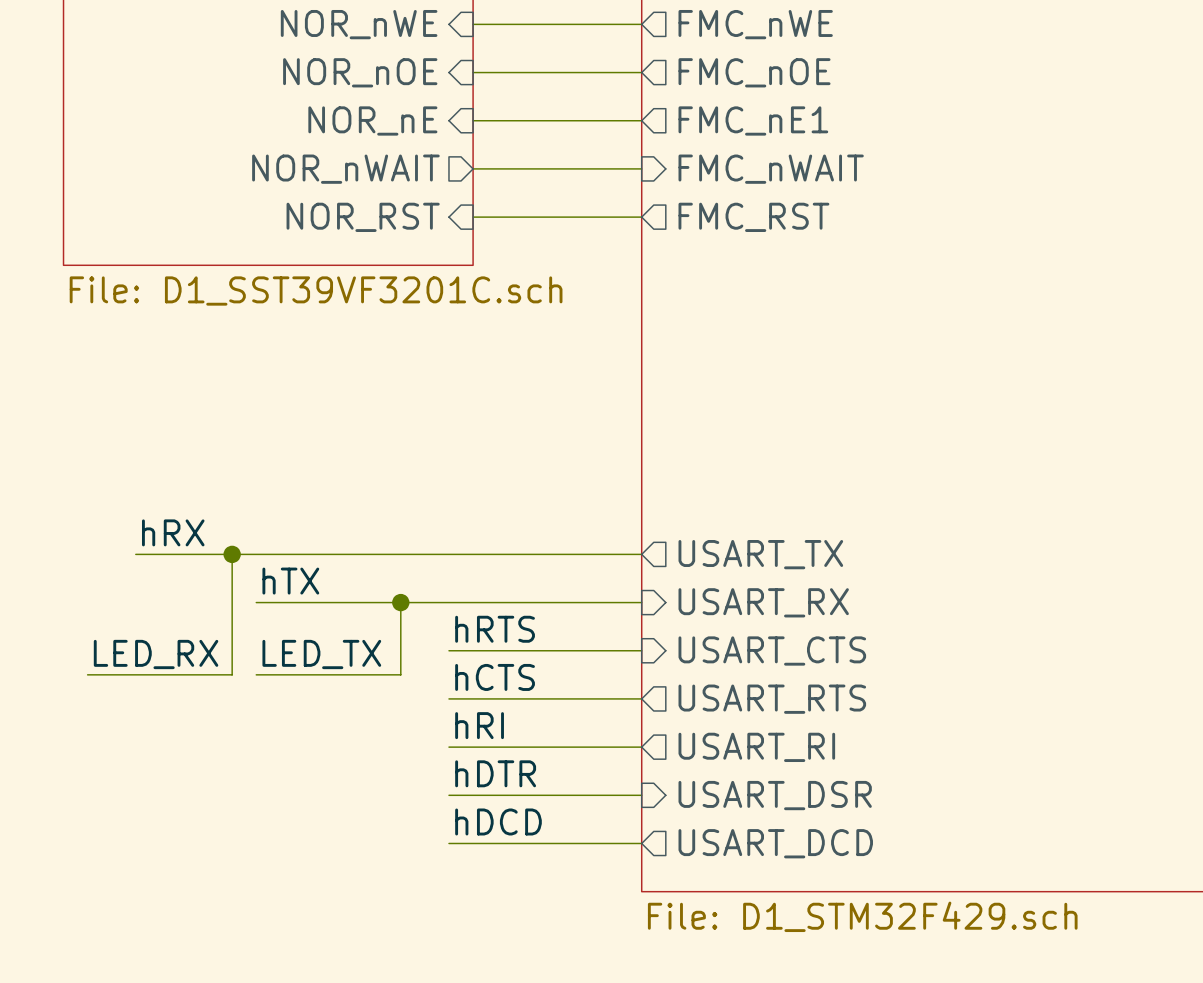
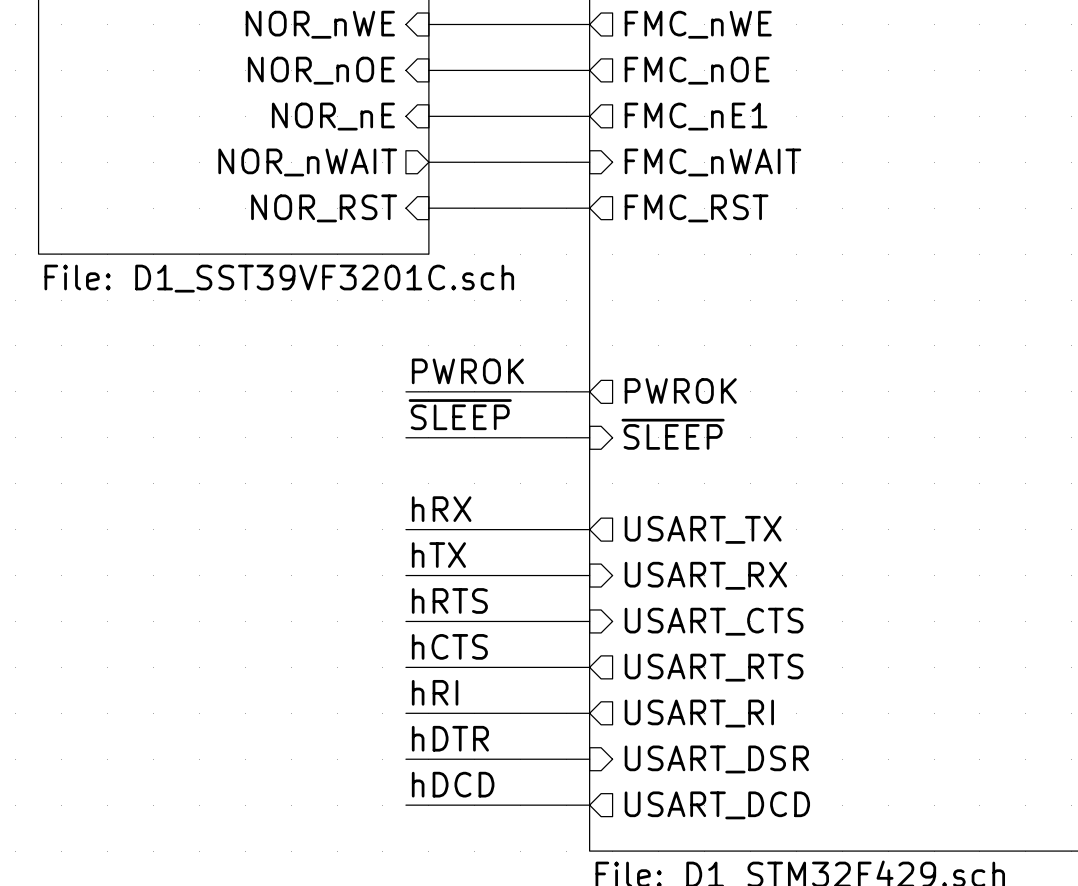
label: none -> PWROK (467, 371)
sheet pin: none -> PWROK (680, 390)
wire: none -> (405, 391) (589, 391)
label: none -> ~{SLEEP} (460, 414)
sheet pin: none -> ~{SLEEP} (673, 434)
label position: hRX (173, 532) -> hRX (441, 509)
wire: (135, 554) (448, 554) -> none
wire: (232, 554) (232, 674) (87, 674) -> none
junction: (232, 554) -> none
label position: hTX (290, 581) -> hTX (438, 555)
wire: (256, 602) (448, 602) -> (405, 437) (589, 437)
wire: (400, 602) (400, 674) (256, 674) -> none
junction: (400, 602) -> none
label: LED_RX (156, 654) -> none
label: LED_TX (321, 654) -> none

